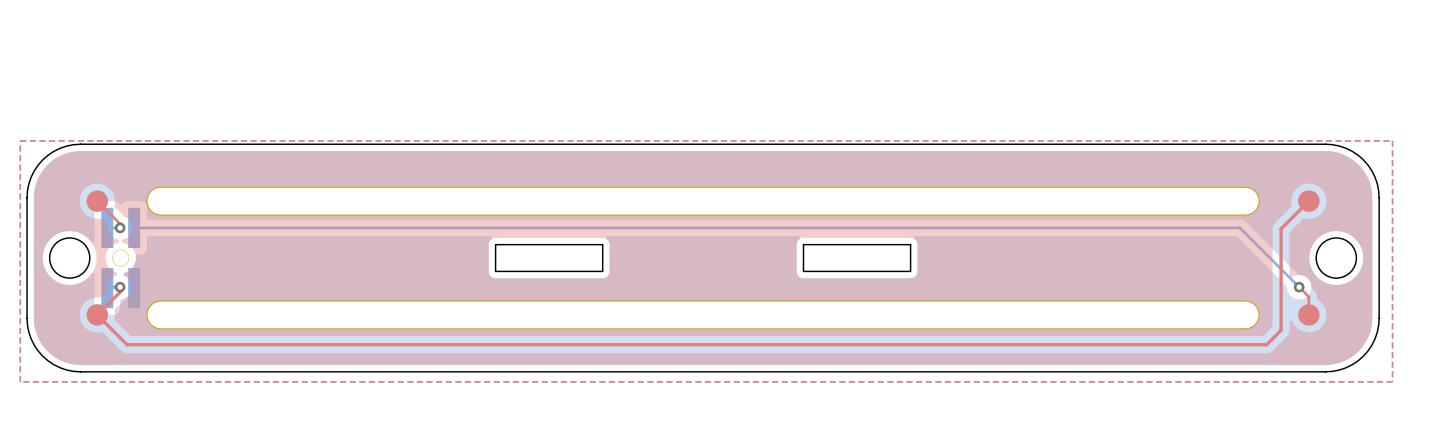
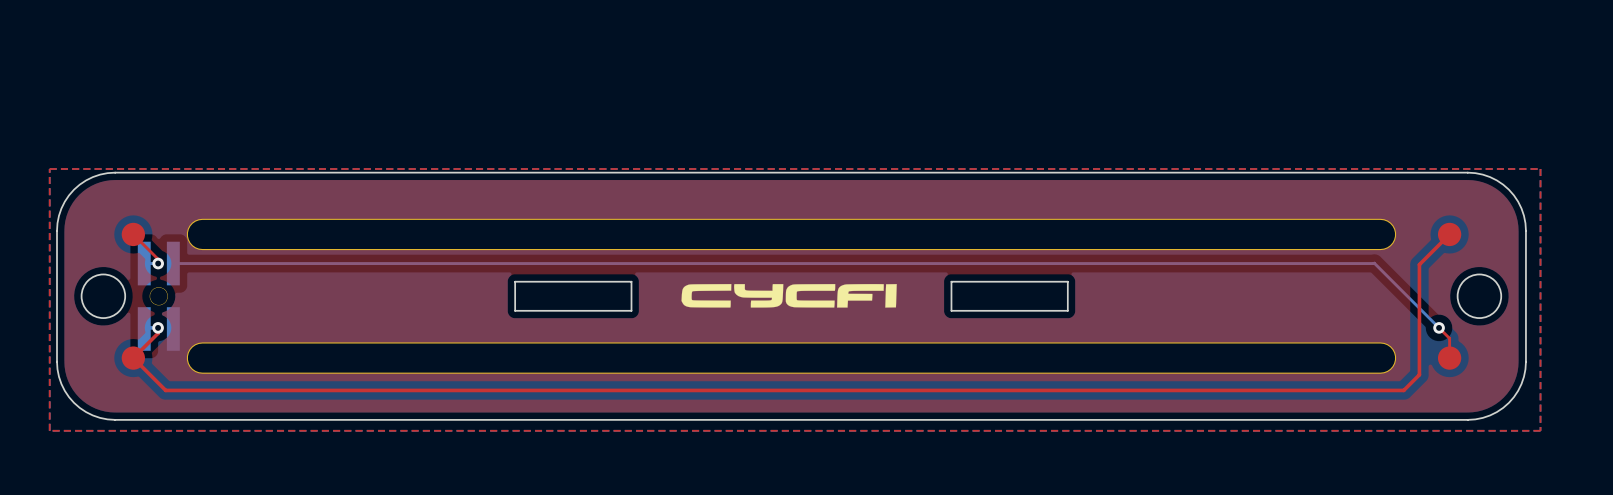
board edge: (495, 244) (495, 271) -> (566, 281) (515, 281) (515, 310) (566, 310)
board edge: (555, 244) (602, 244) (602, 271) (555, 271) -> (631, 281) (631, 310)
board edge: (850, 244) (803, 244) (803, 271) (850, 271) -> (951, 281) (951, 310)
board edge: (910, 244) (910, 271) -> (1016, 281) (1067, 281) (1067, 310) (1016, 310)
drawing: none -> [681, 284, 897, 308]

